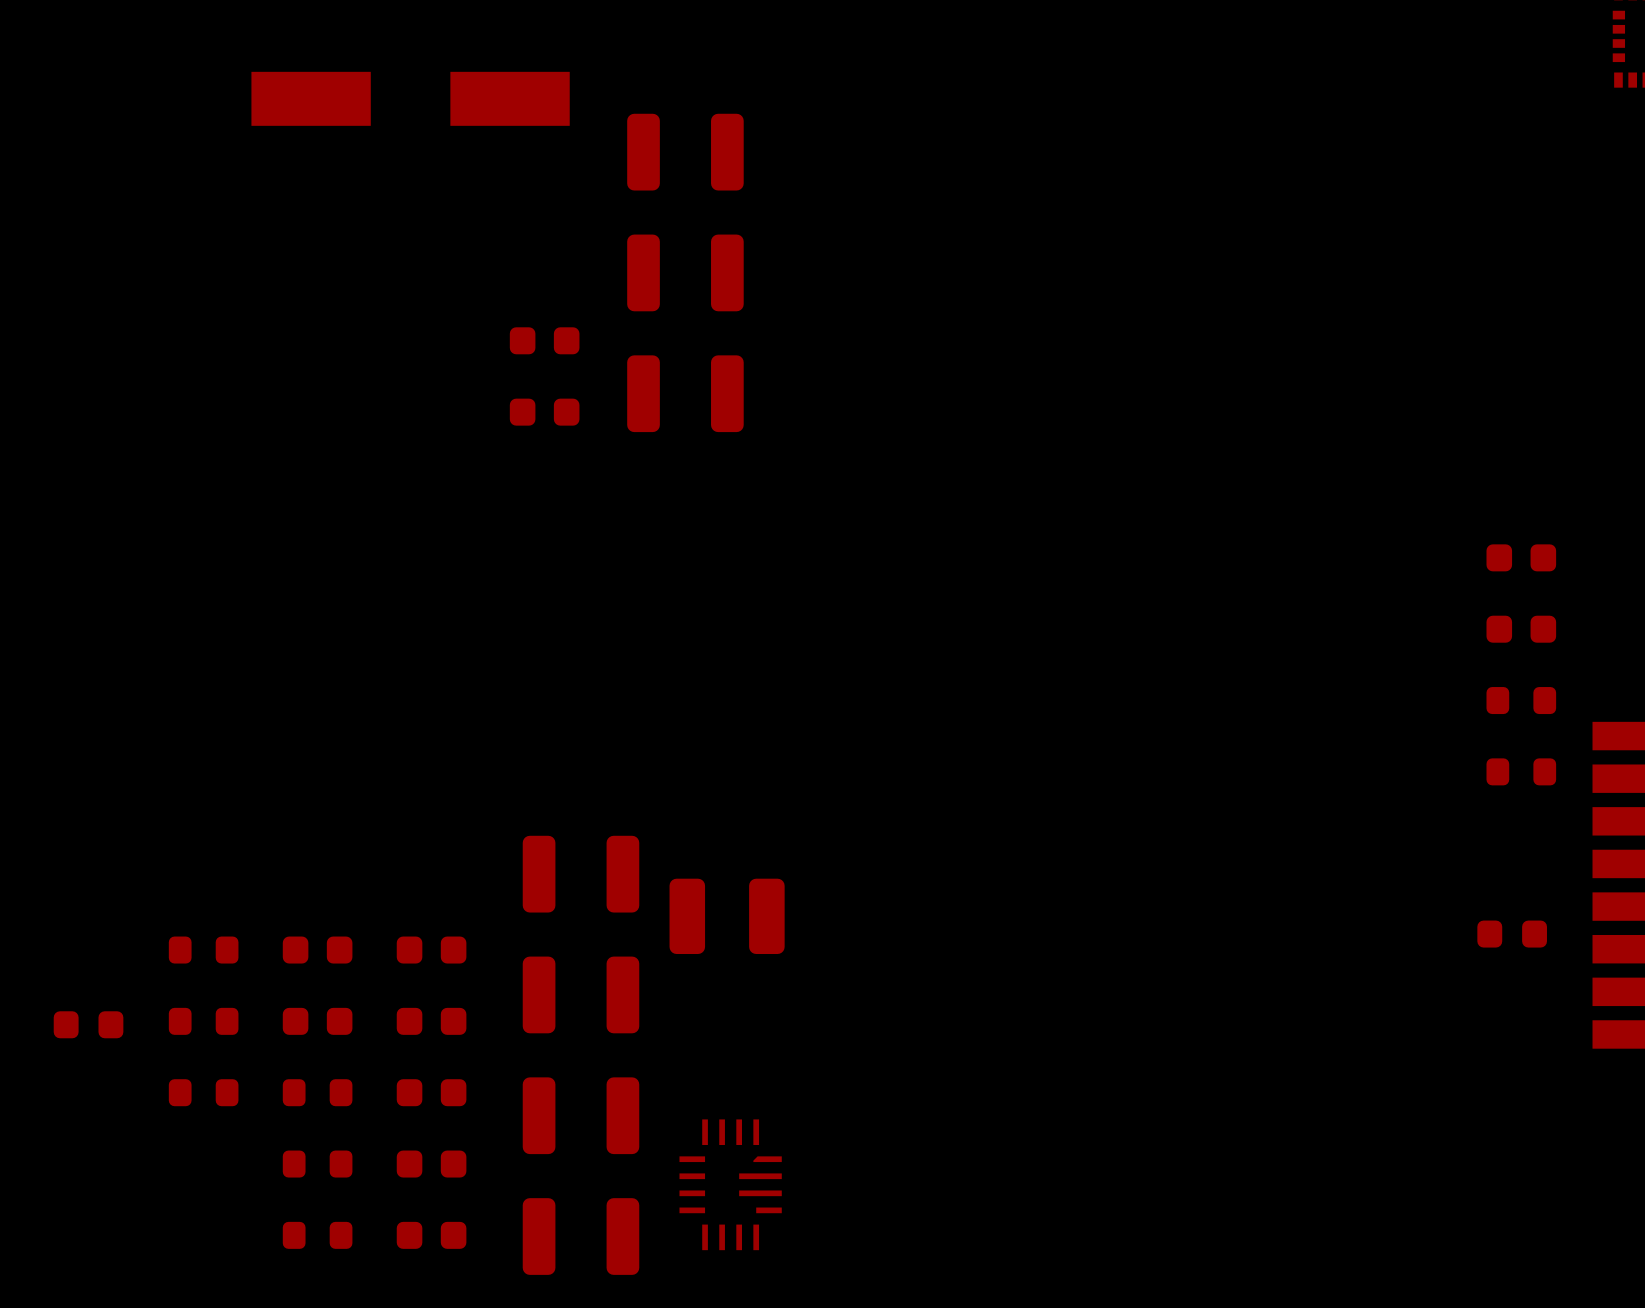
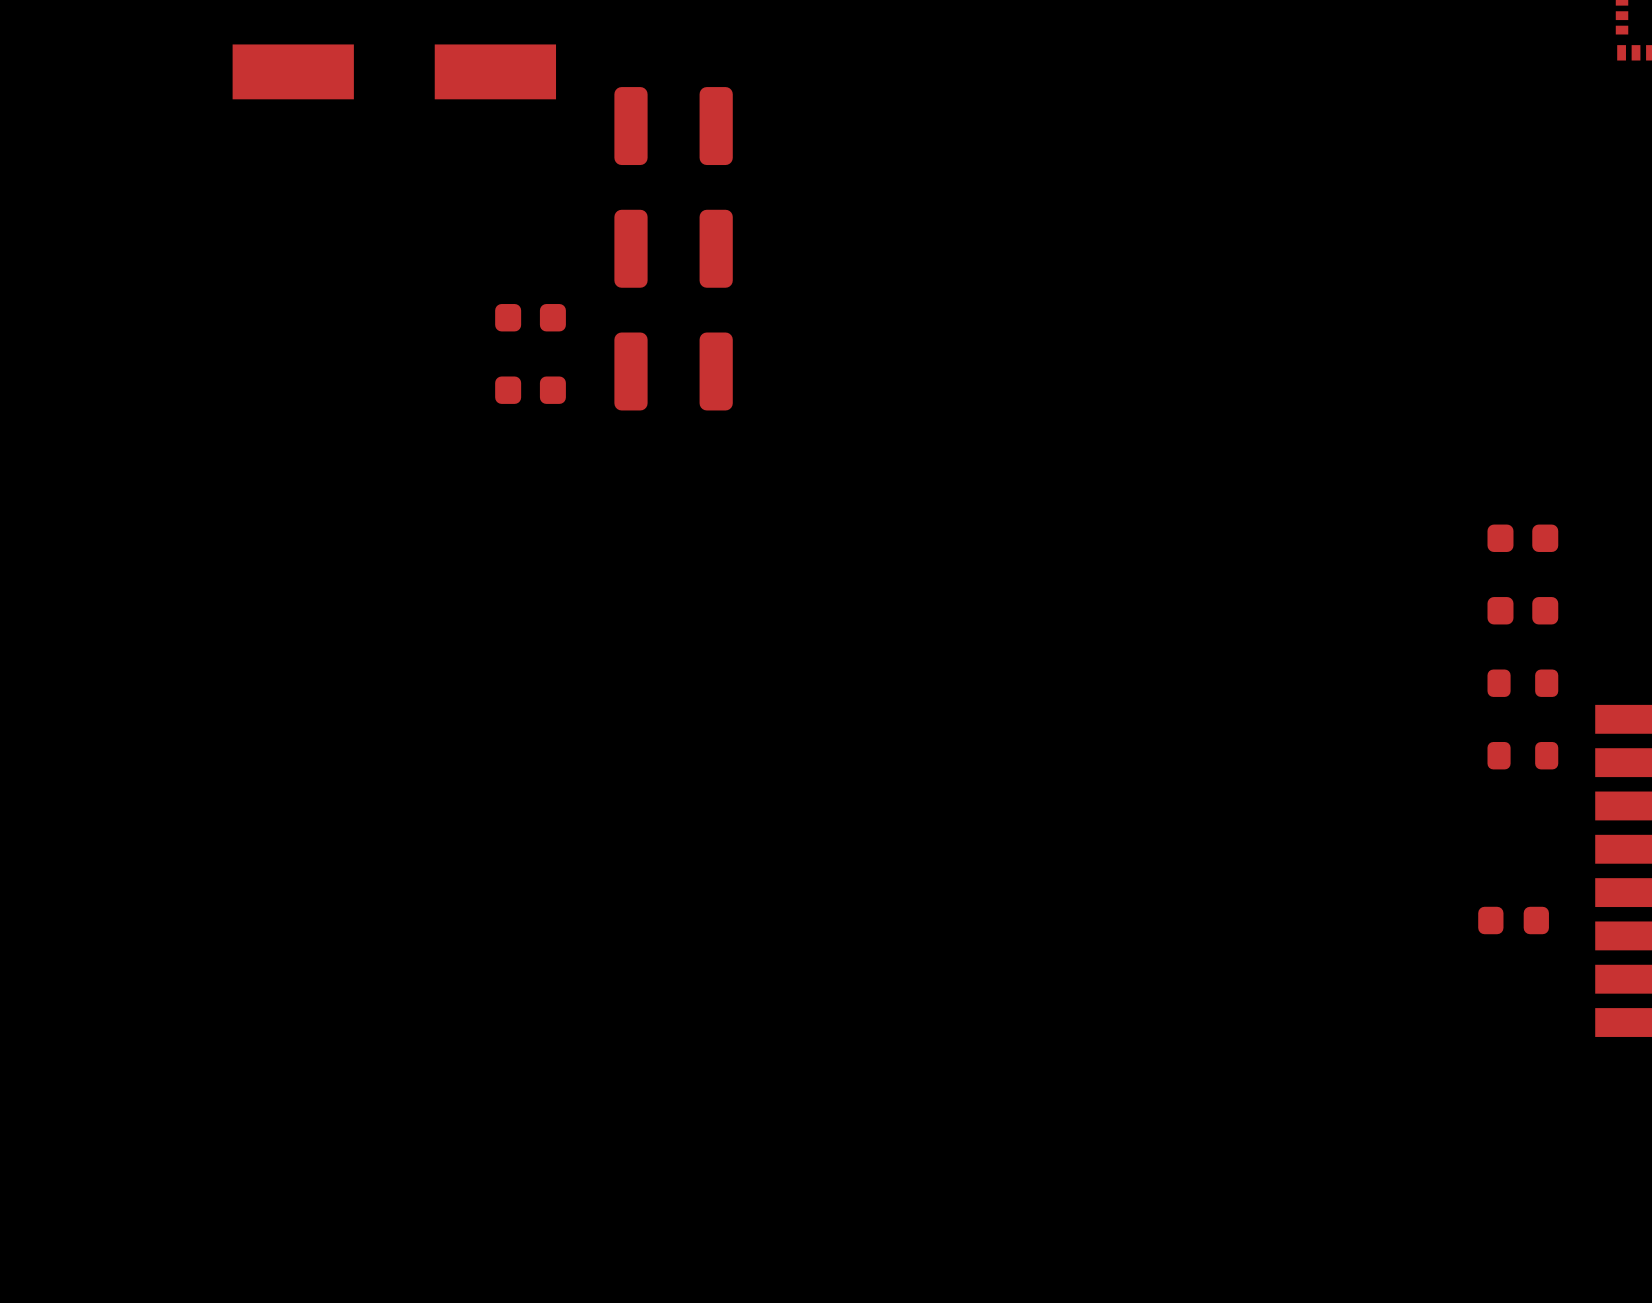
part: (580, 874) -> none
part: (727, 916) -> none
part: (203, 950) -> none
part: (317, 950) -> none
part: (431, 950) -> none
part: (580, 994) -> none
part: (203, 1021) -> none
part: (317, 1021) -> none
part: (431, 1021) -> none
part: (88, 1024) -> none
part: (203, 1092) -> none
part: (317, 1092) -> none
part: (431, 1092) -> none
part: (580, 1115) -> none
part: (317, 1164) -> none
part: (431, 1164) -> none
part: (730, 1184) -> none
part: (317, 1235) -> none
part: (431, 1235) -> none
part: (580, 1236) -> none

